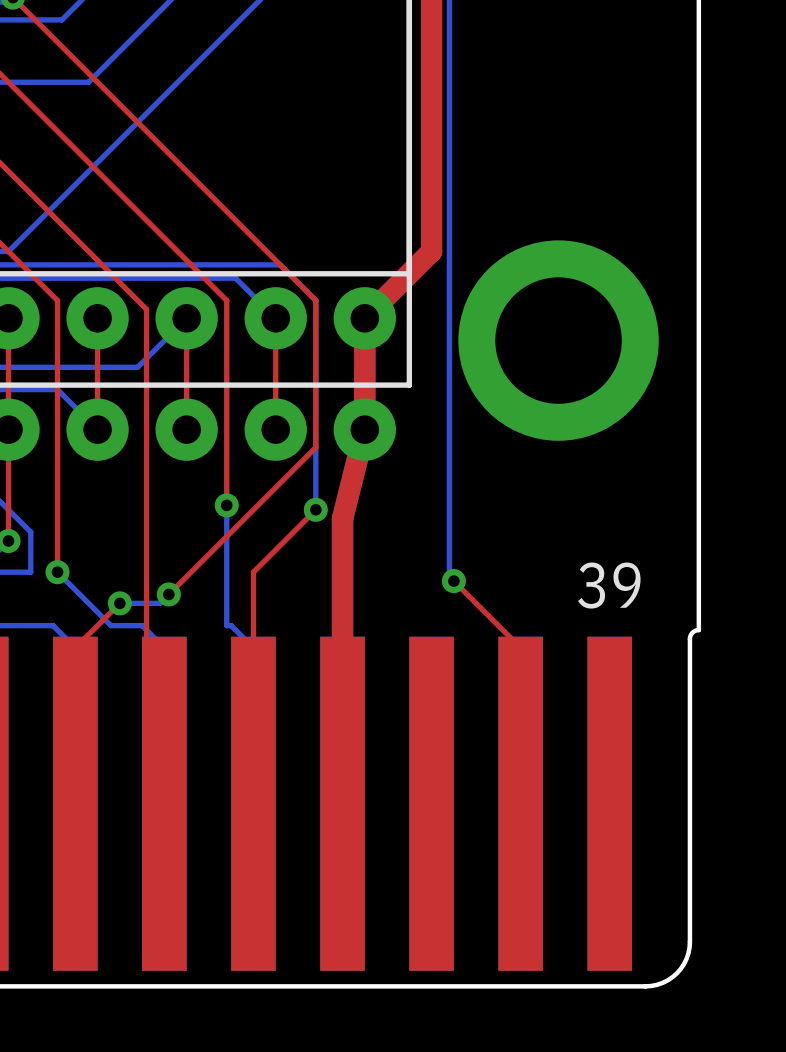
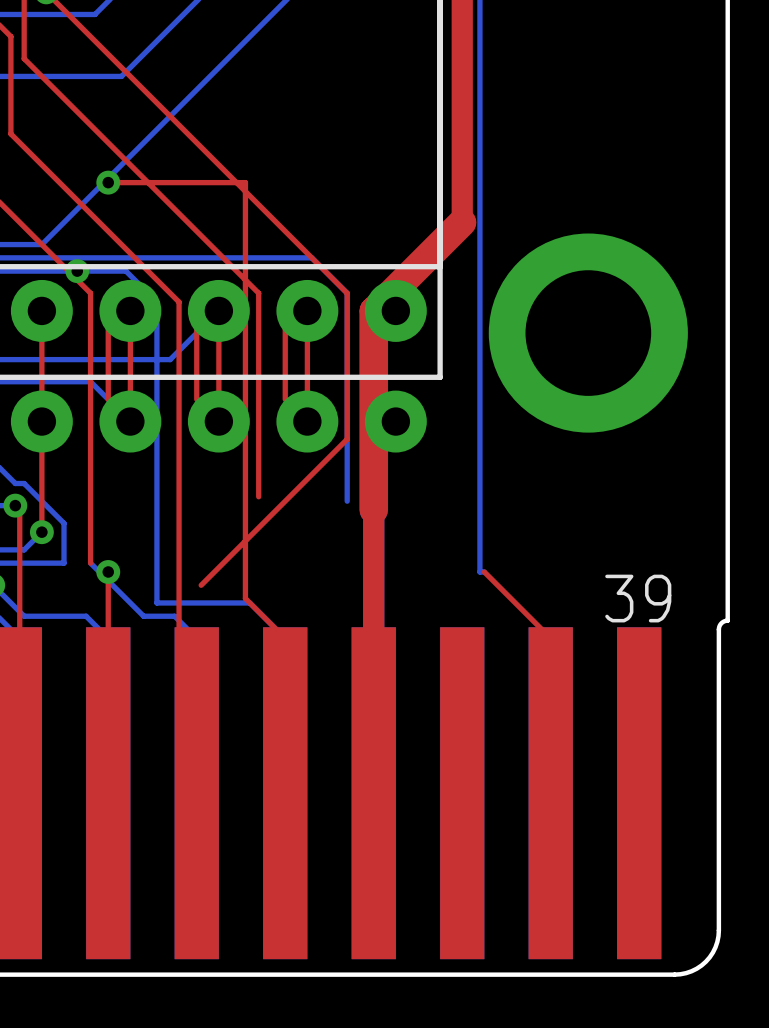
via: none -> (108, 182)
top track: (431, 229) (431, 251) (364, 318) (364, 429) (342, 518) -> (462, 222) (373, 310) (373, 510)
via: none -> (77, 271)
bottom track: (93, 278) (235, 278) (275, 318) -> none
top track: none -> (108, 310) (108, 399)
top track: none -> (196, 310) (196, 399)
top track: none -> (285, 310) (285, 399)
bottom track: (226, 505) (226, 625) (231, 625) -> (125, 271) (156, 302) (156, 602) (249, 602) (263, 616)
via: (226, 505) -> none
top track: (315, 509) (253, 572) (253, 647) -> (108, 182) (245, 182) (245, 598) (285, 638)
via: (315, 509) -> none
via position: (57, 572) -> (108, 571)
via: (453, 581) -> none
part text position: 39 (609, 585) -> 39 (638, 598)
bottom track: (168, 594) (159, 603) (119, 603) -> none
via: (168, 594) -> none
top track: (119, 603) (75, 647) -> (108, 571) (108, 638)
via: (119, 603) -> none

